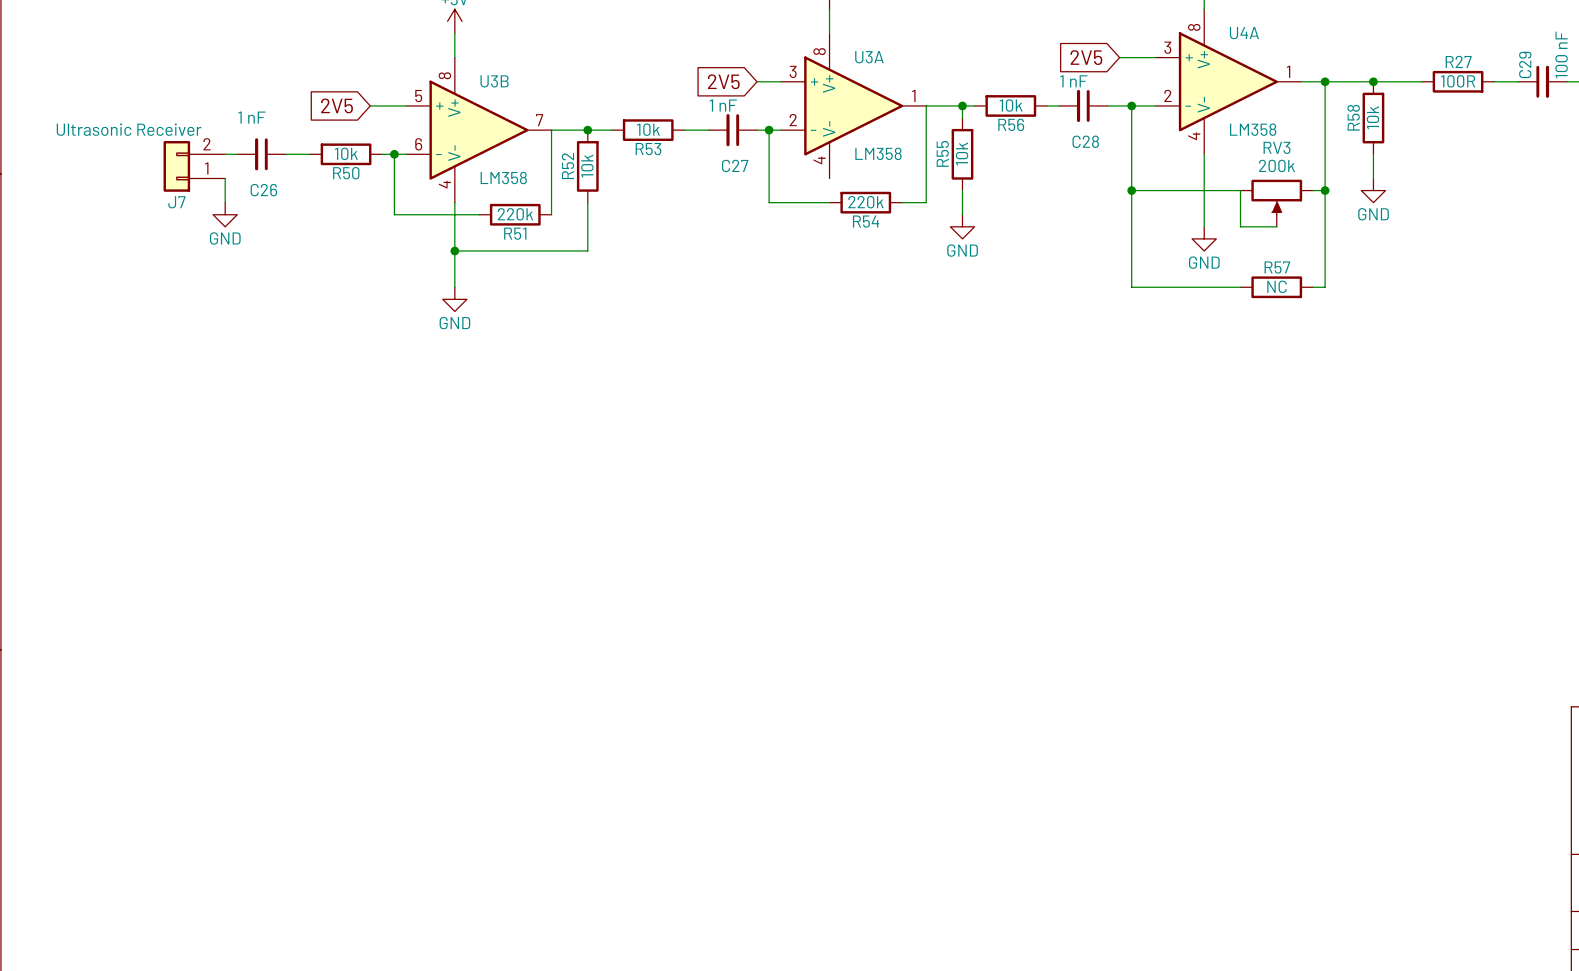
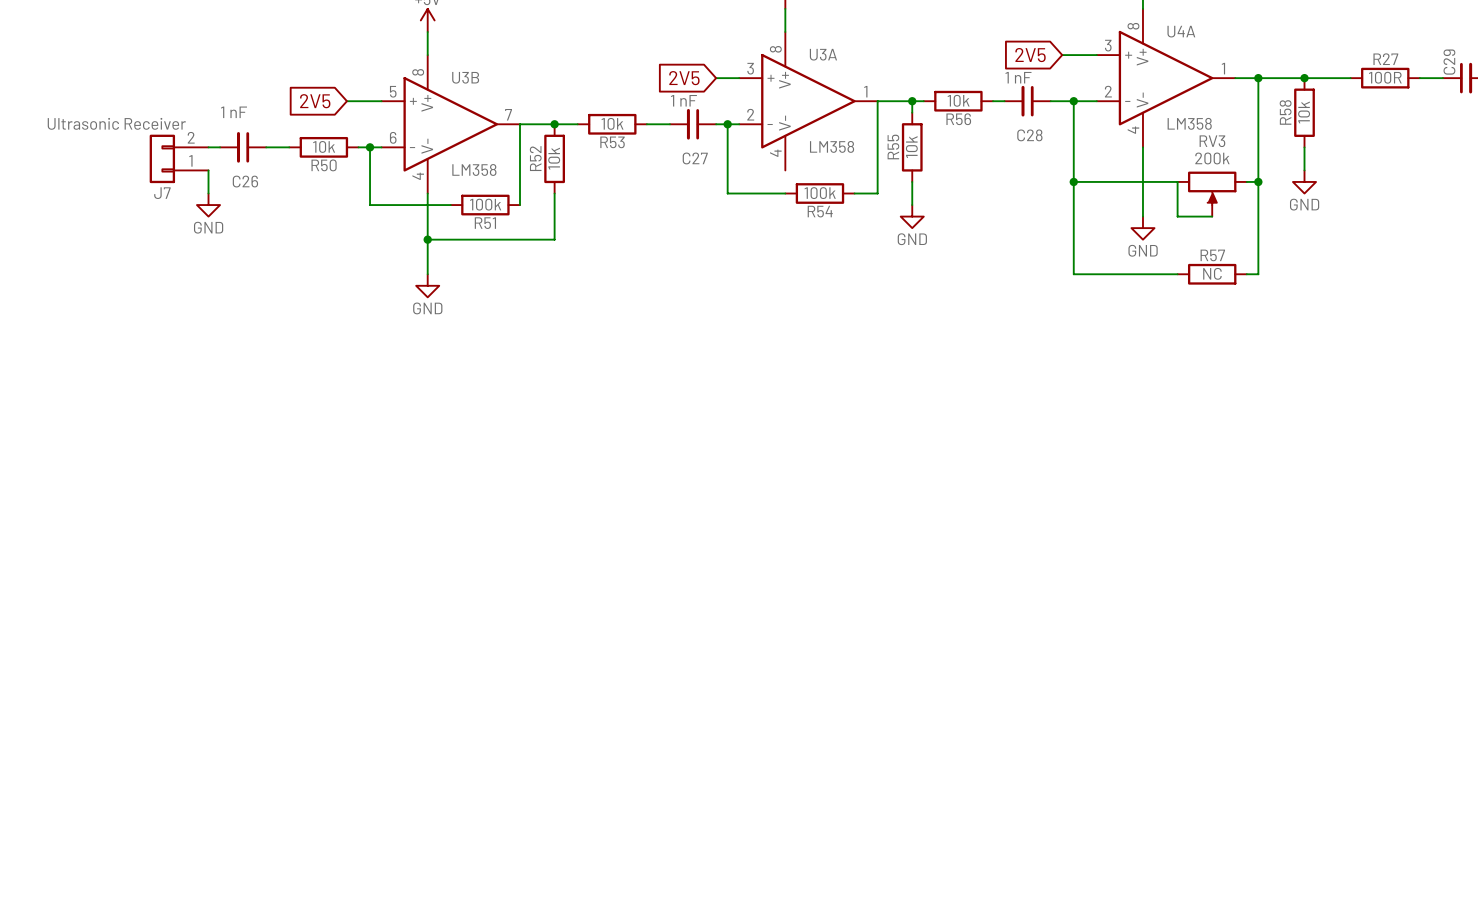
R54 value: 220k (866, 202) -> 100k (820, 193)
R51 value: 220k (515, 214) -> 100k (485, 204)

